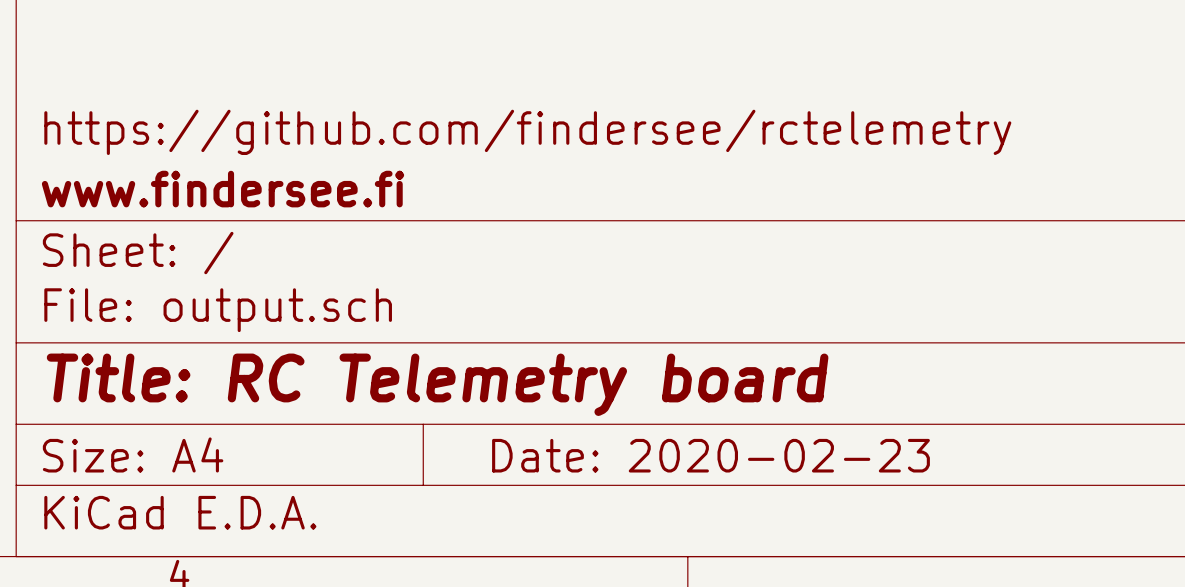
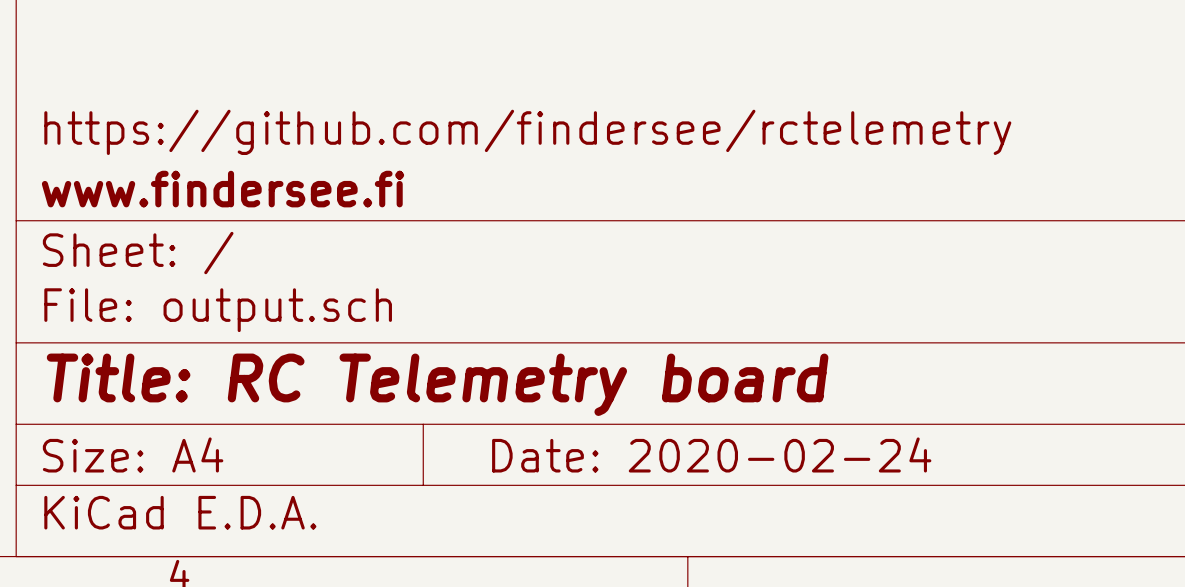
title block: Date: 2020-02-23 (711, 455) -> Date: 2020-02-24 (711, 454)

